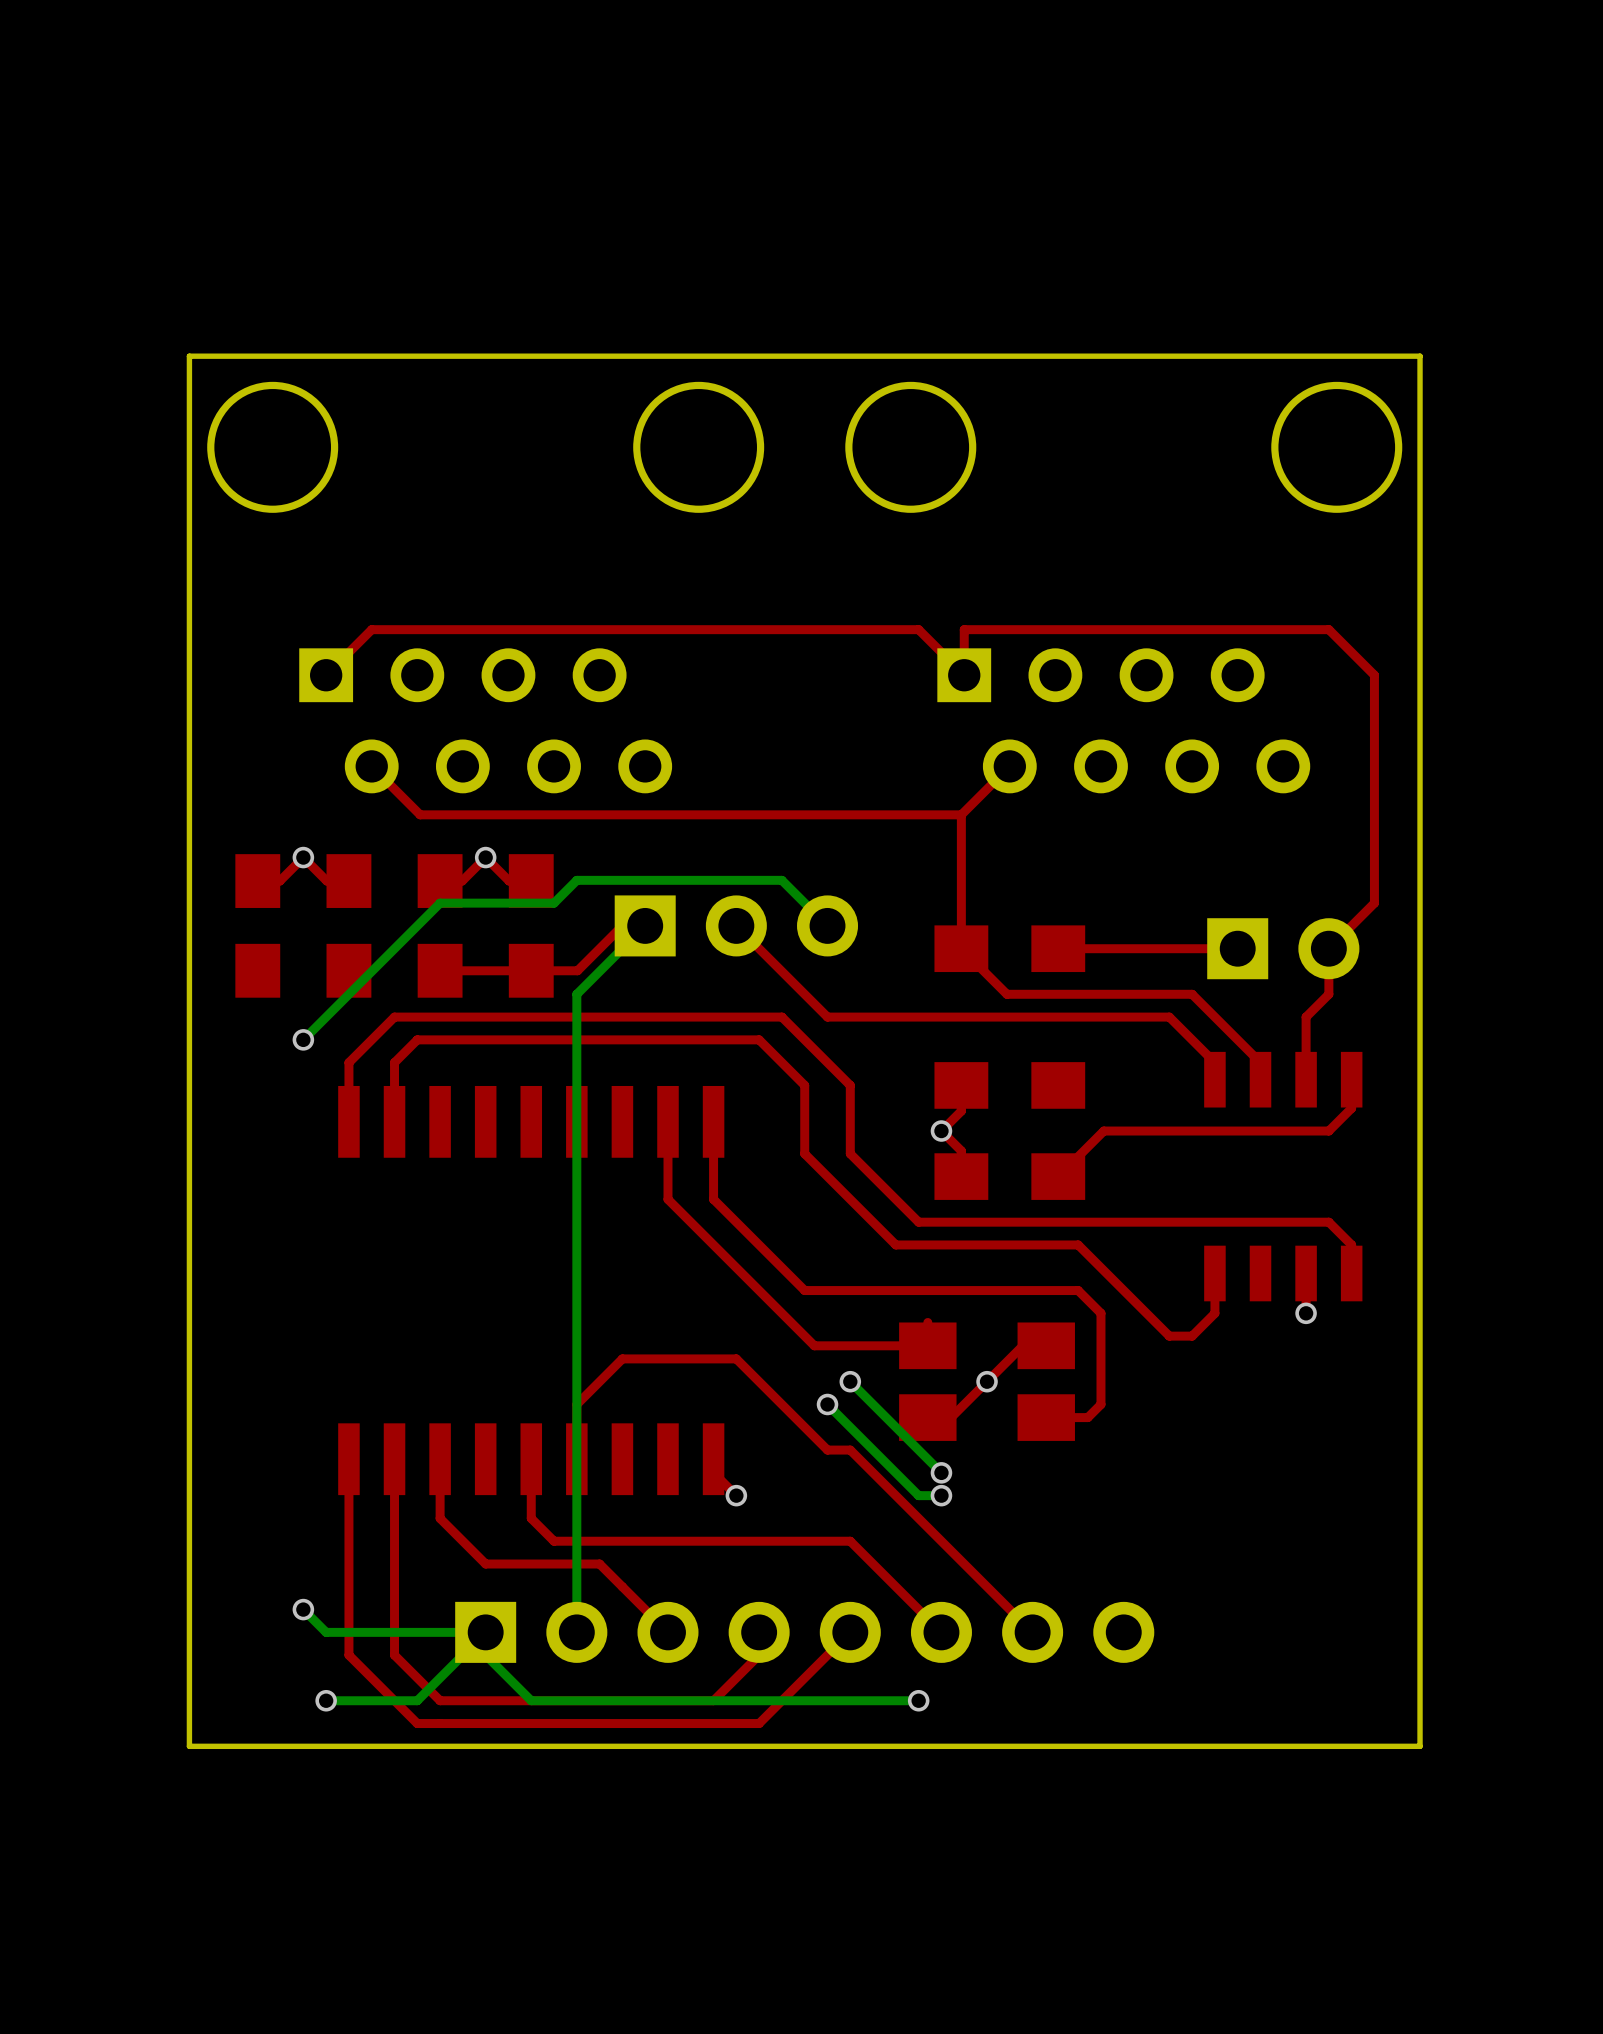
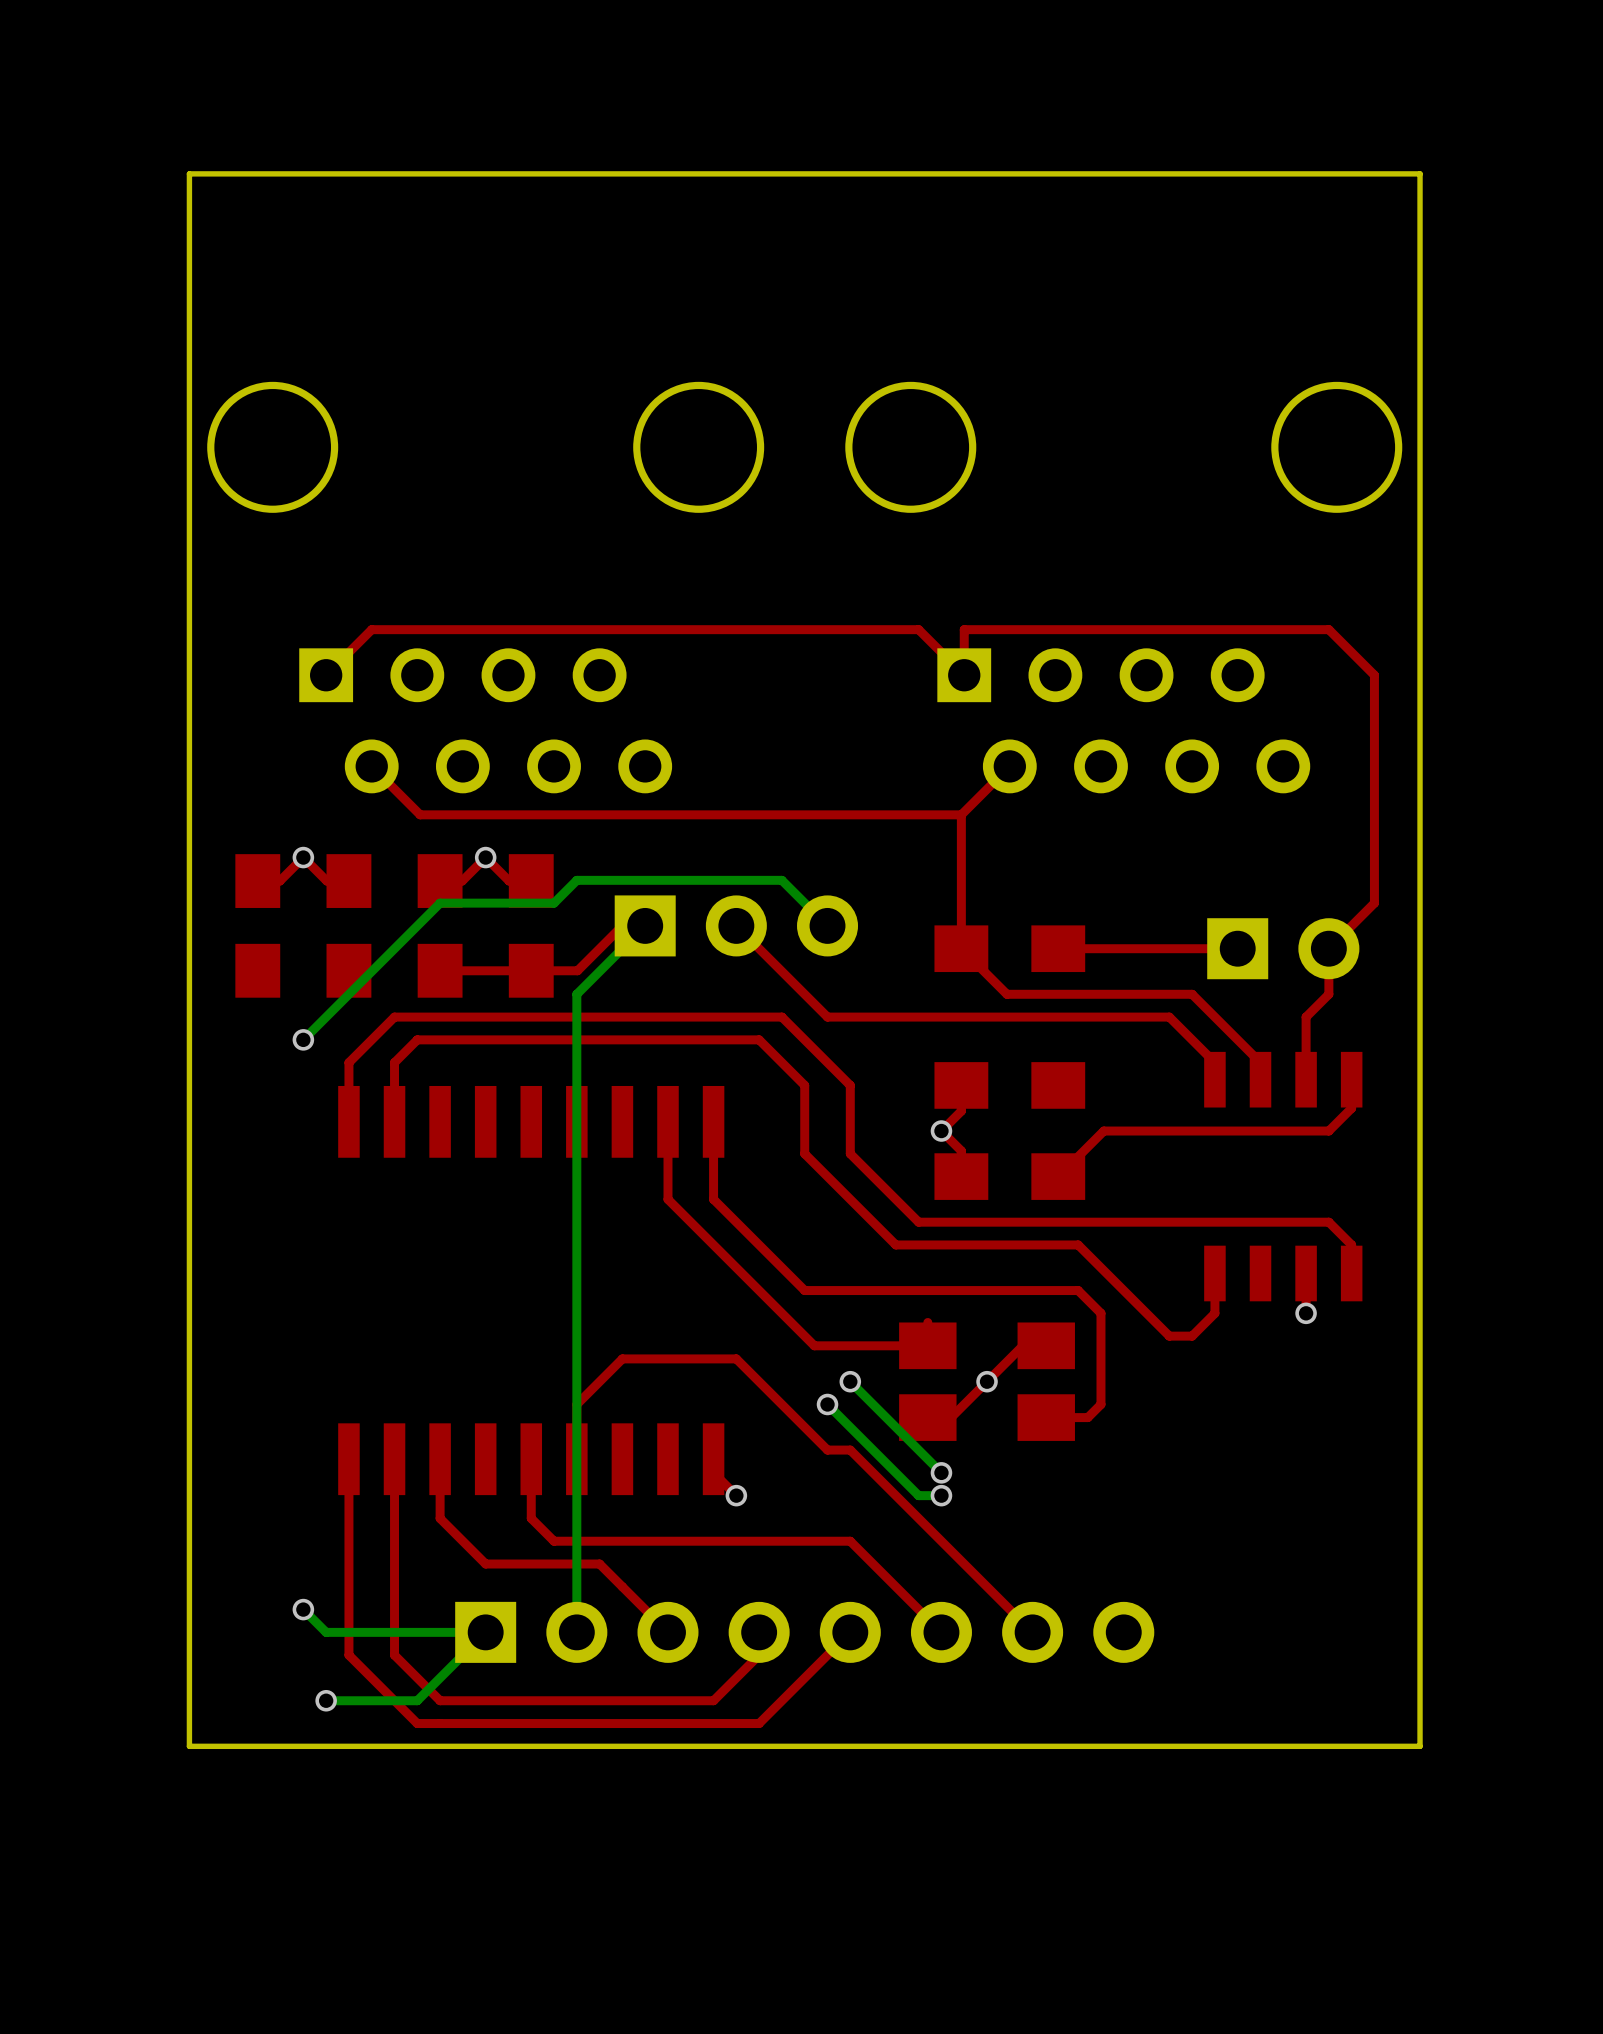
board edge: (1420, 356) (189, 356) -> (1420, 356) (1420, 173) (189, 173) (189, 356)
bottom track: (485, 1632) (485, 1655) (531, 1700) (918, 1700) -> none
via: (918, 1700) -> none

